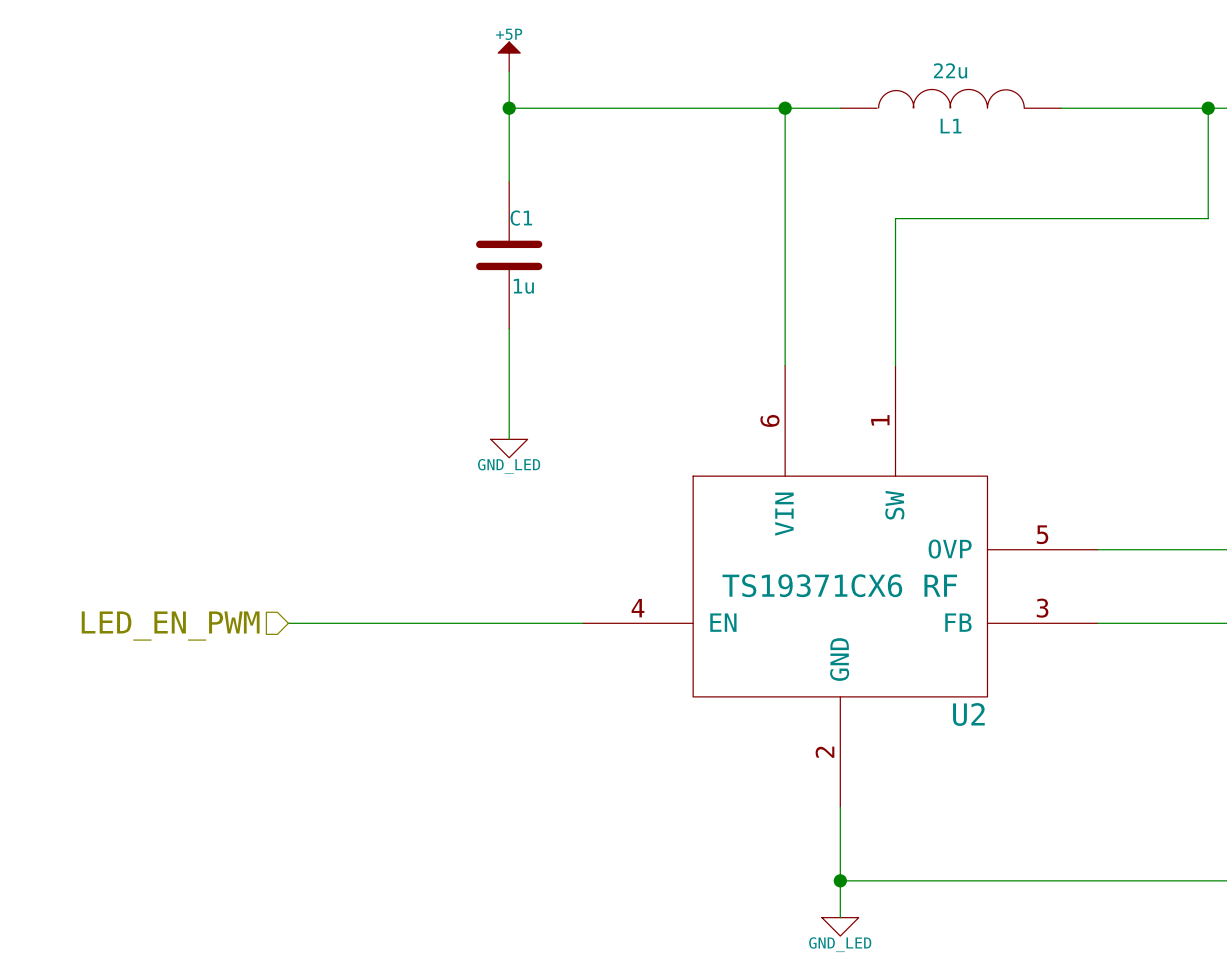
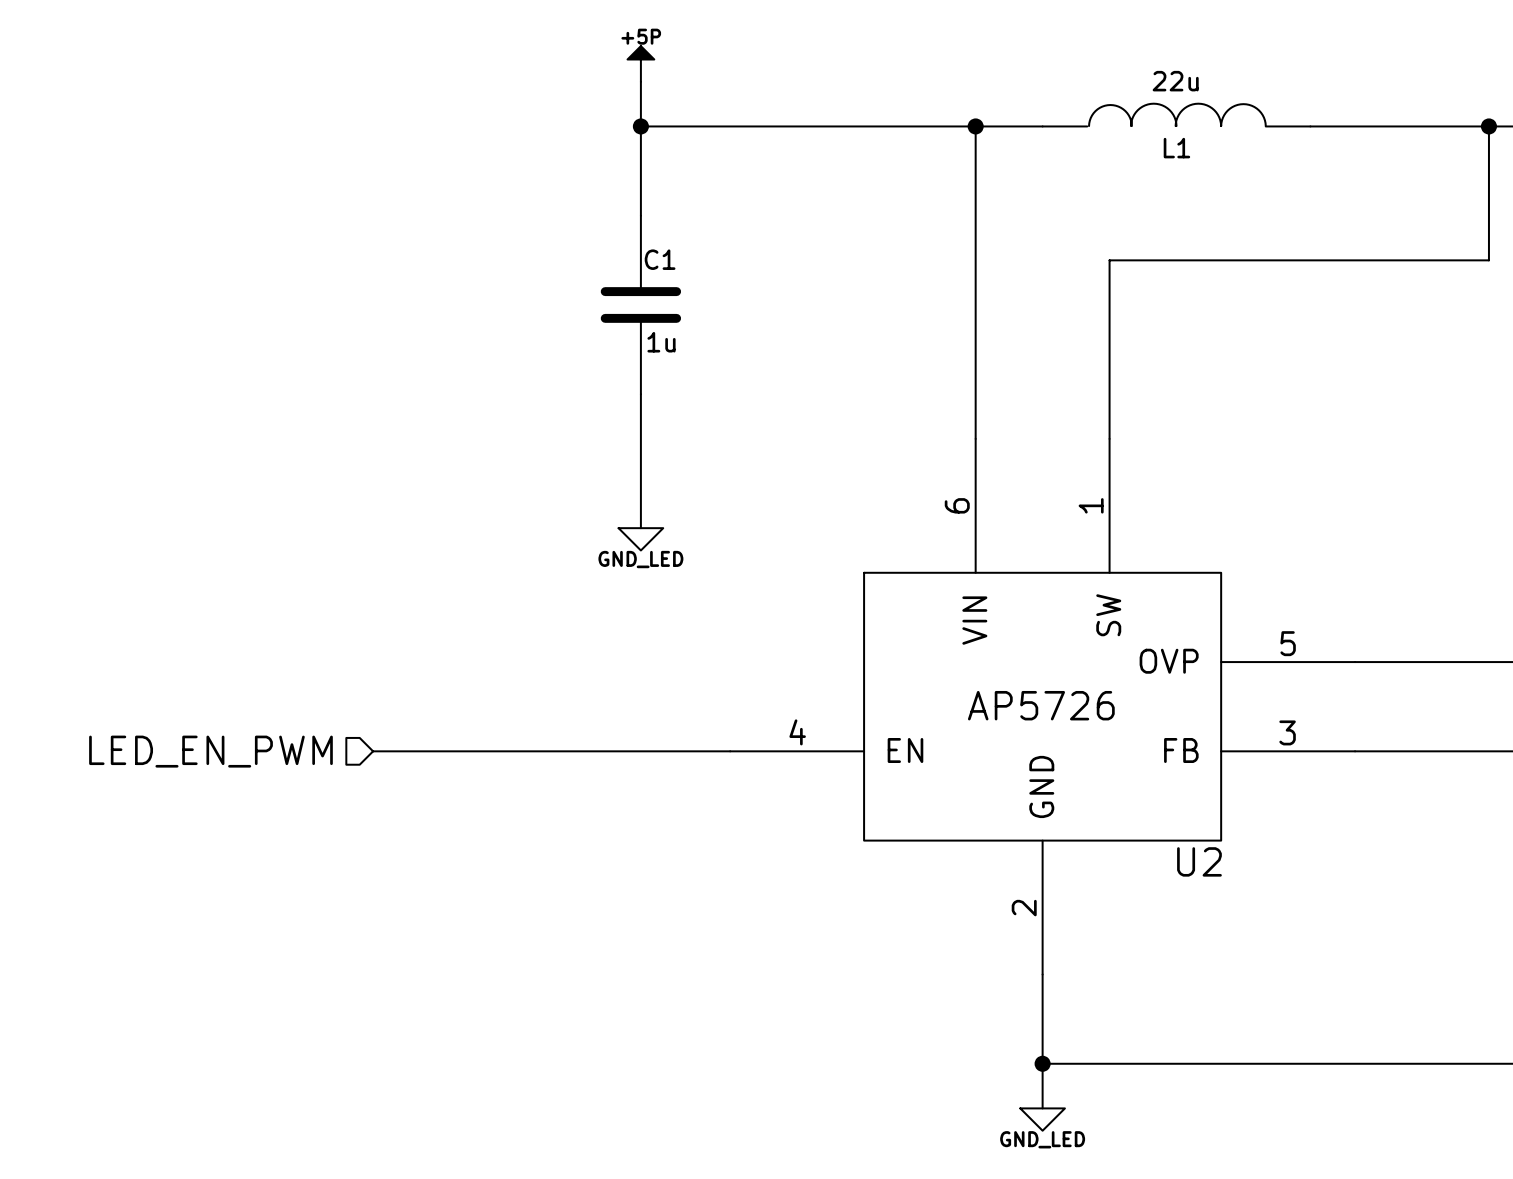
U2 value: TS19371CX6 RF (839, 585) -> AP5726 (1041, 705)

